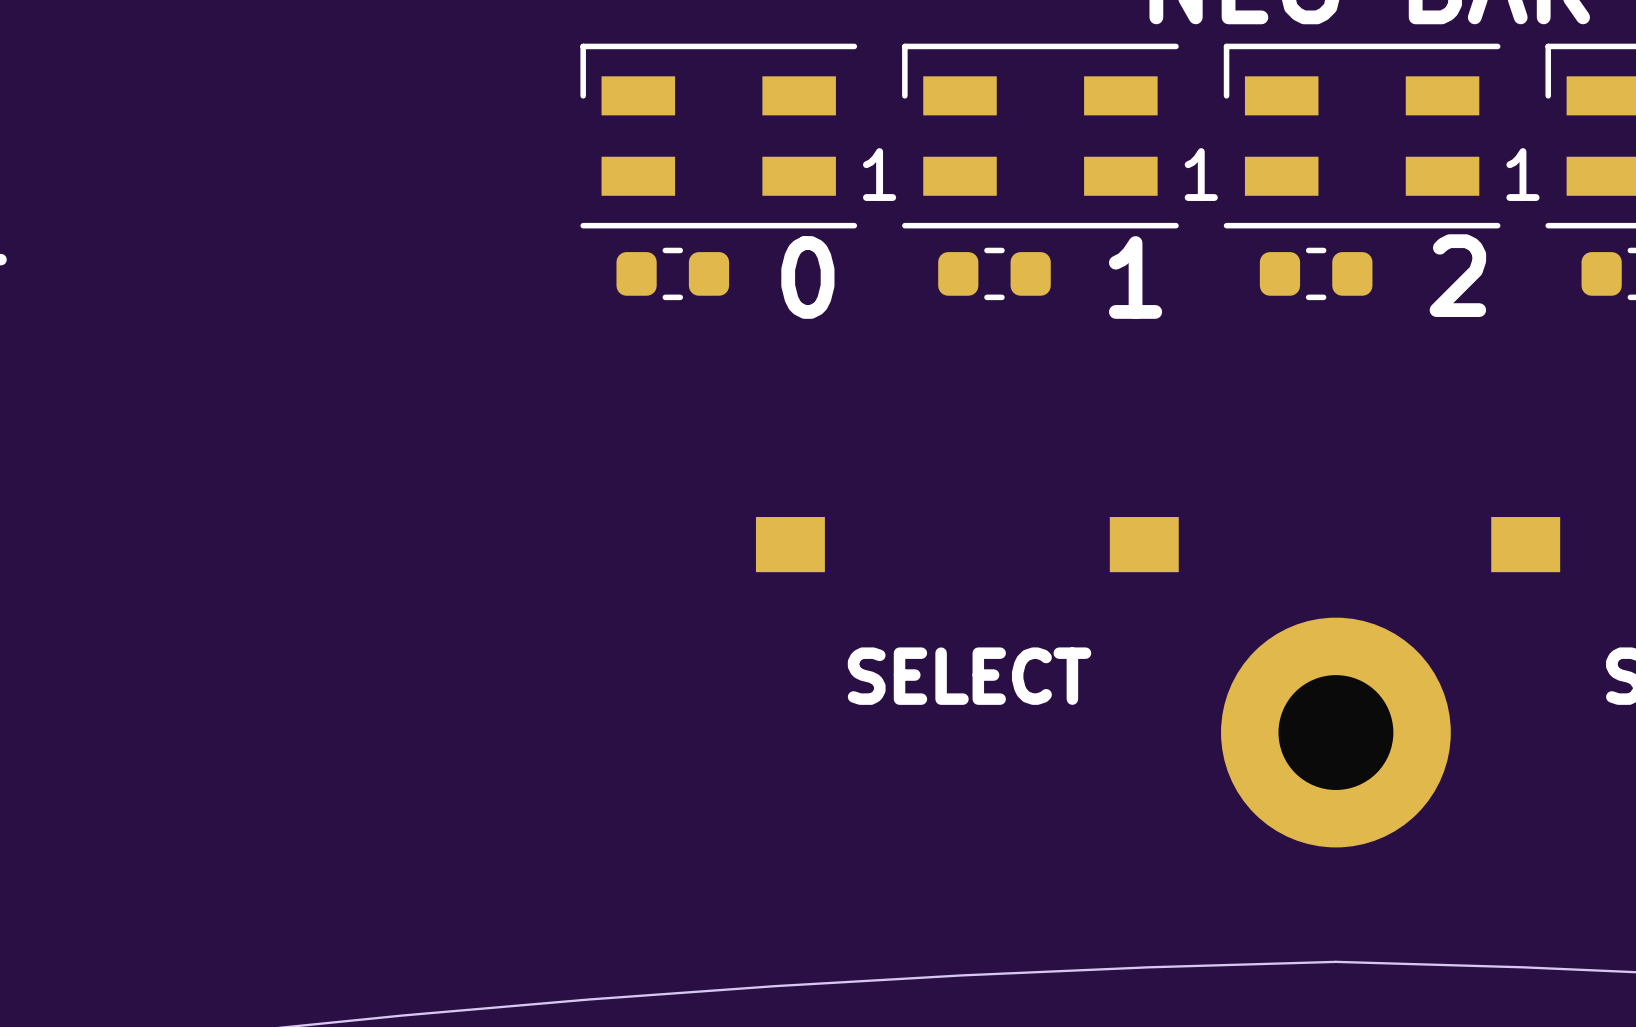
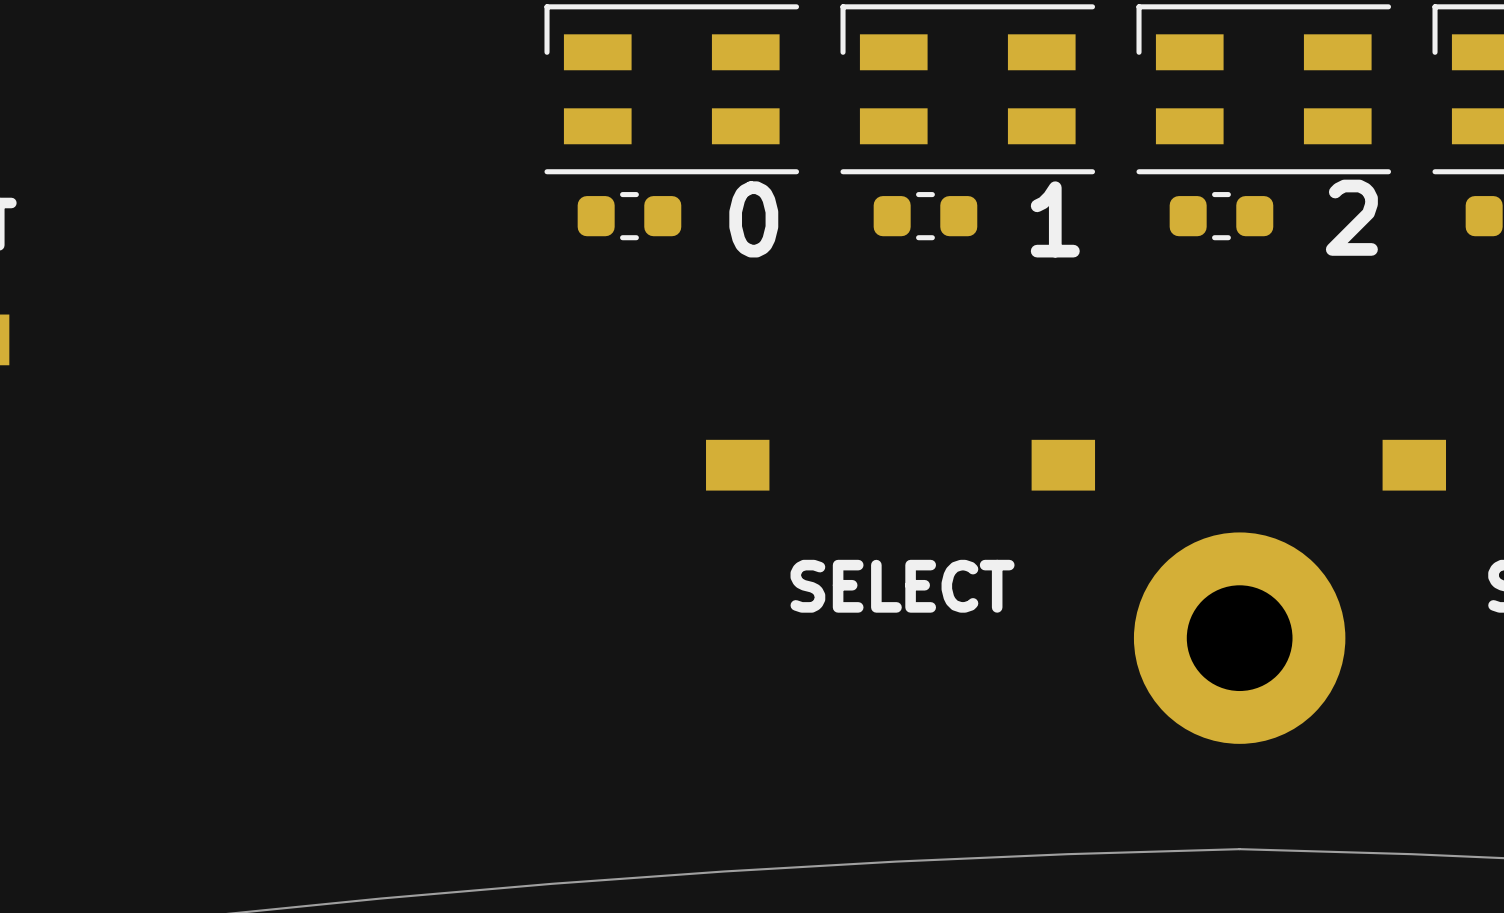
part text: 1 (879, 174) -> none
part text: 1 (1201, 174) -> none
part text: 1 (1522, 174) -> none

